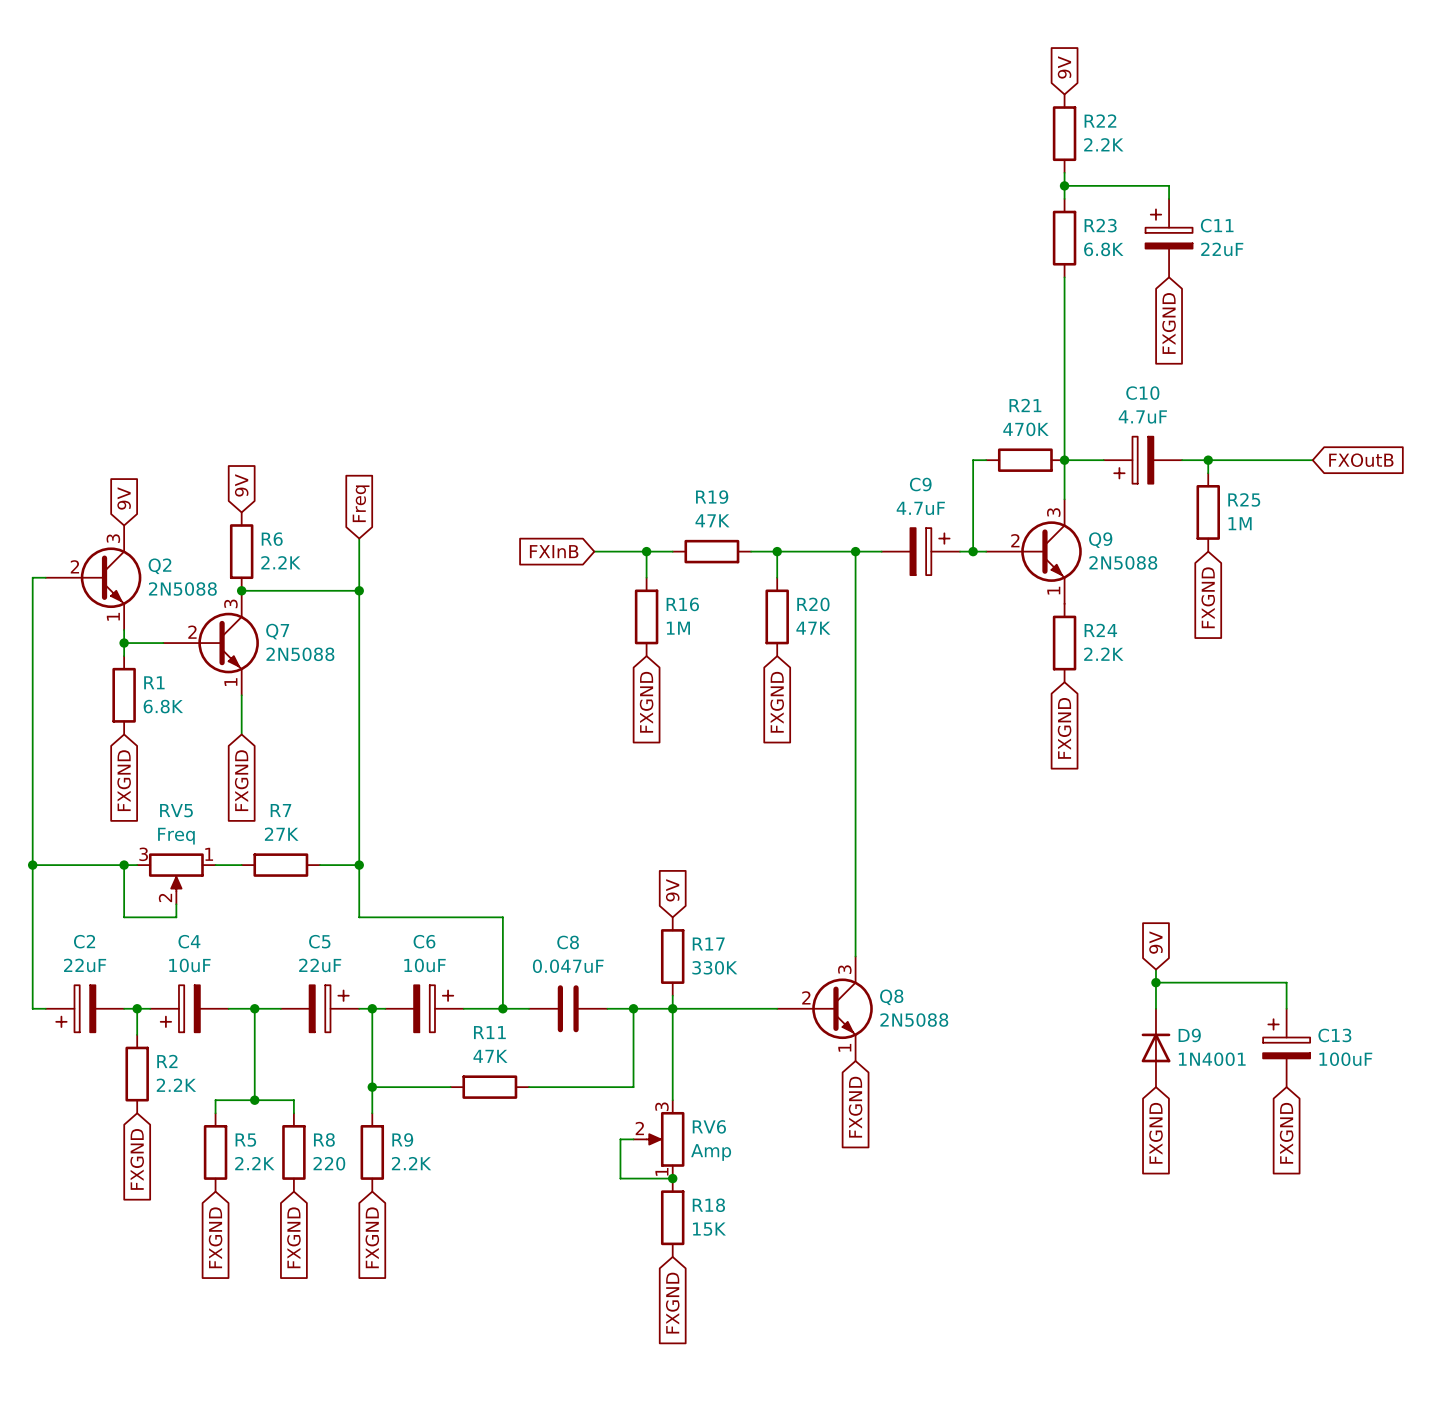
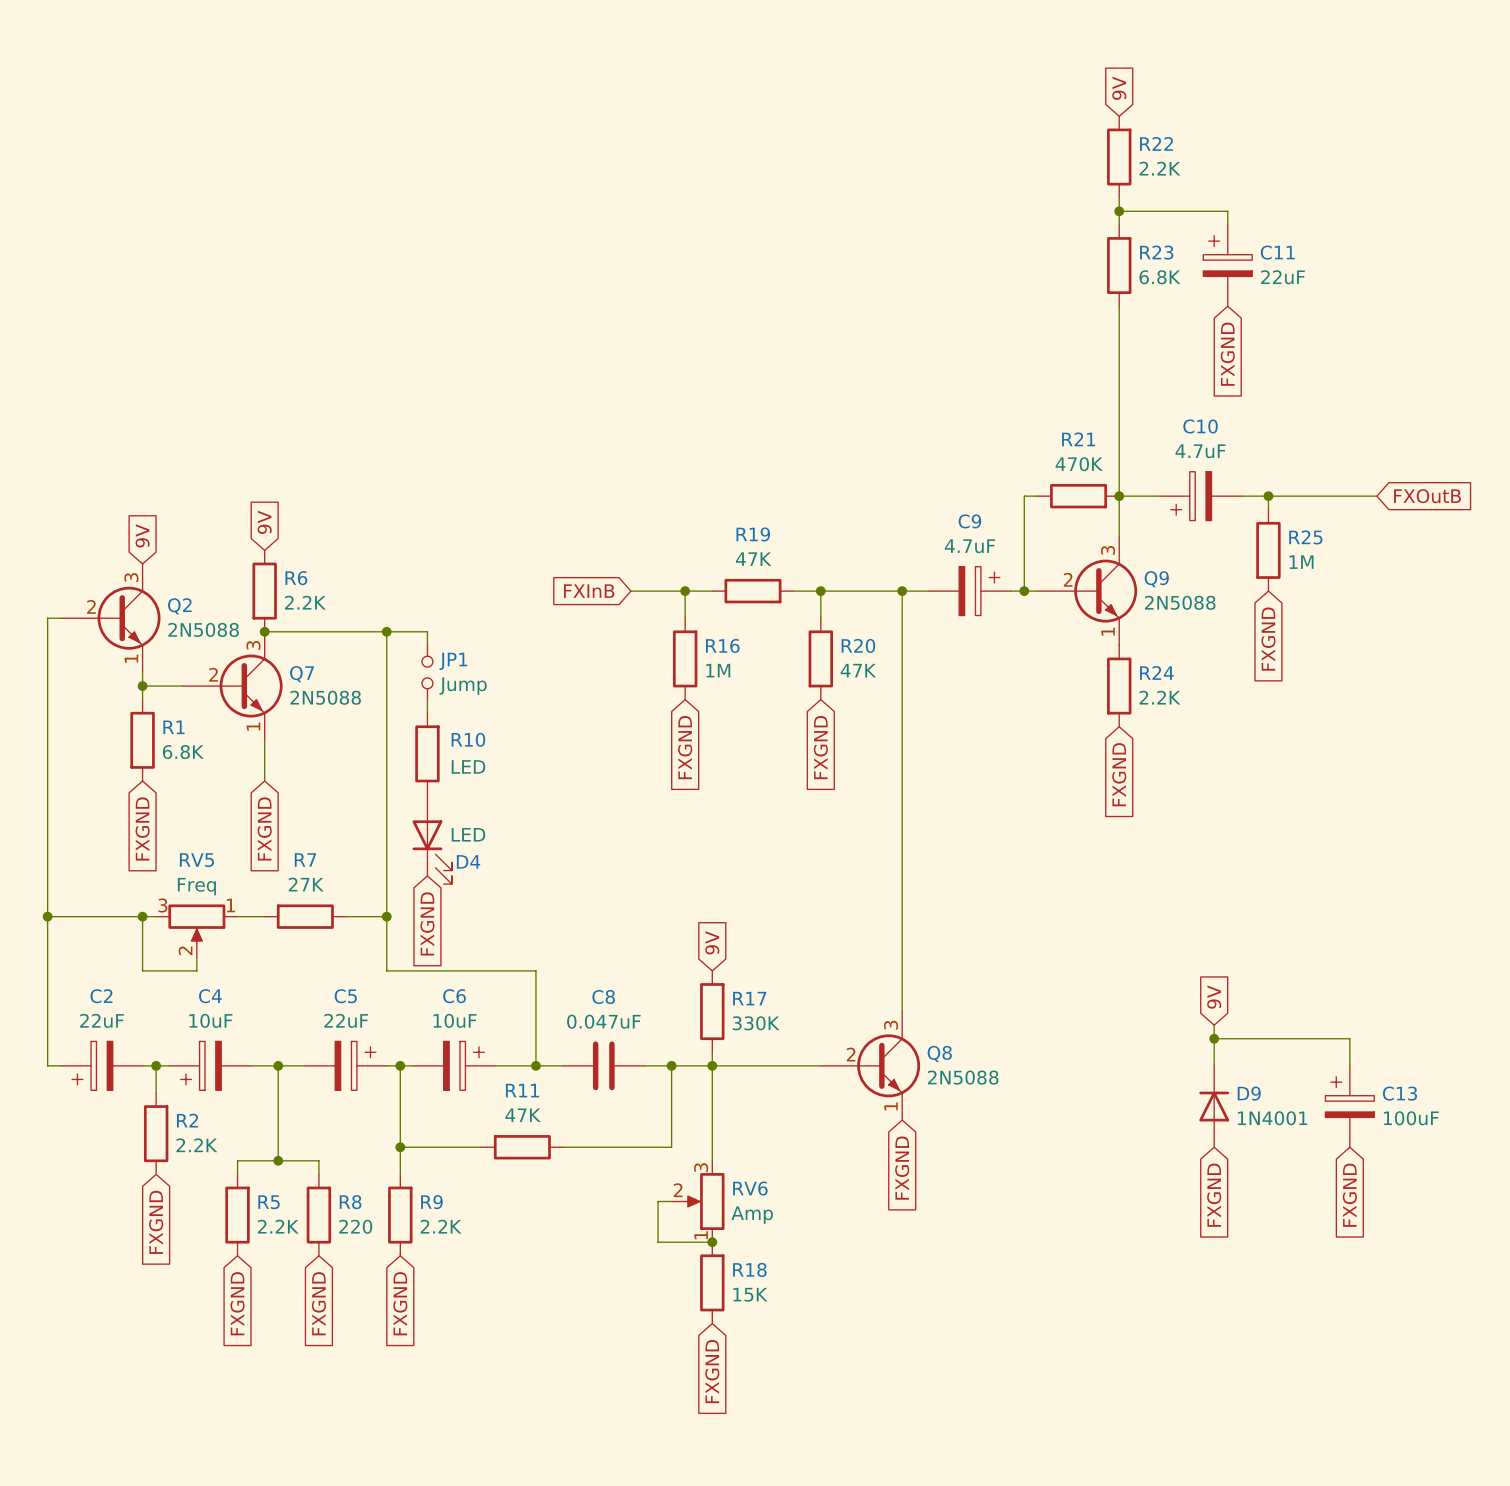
global label: Freq (361, 503) -> none
wire: (359, 538) (359, 590) -> (427, 645) (427, 631) (386, 631)
JP1: none -> Jump (427, 672)
wire: none -> (427, 699) (427, 713)
R10: none -> LED (427, 753)
D4: none -> LED (432, 839)
global label: none -> FXGND (427, 923)

